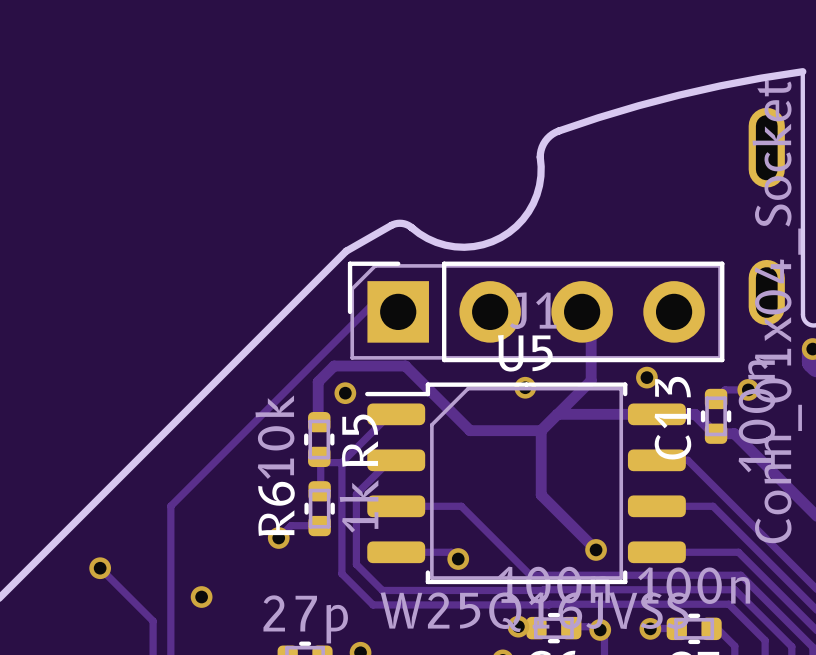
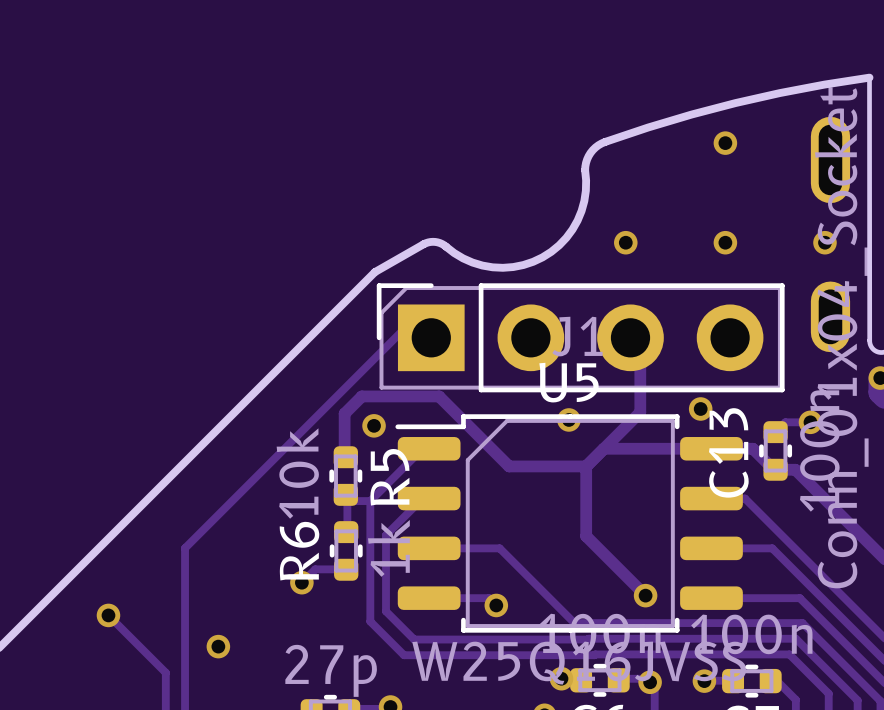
via: none -> (725, 143)
via: none -> (625, 242)
via: none -> (725, 242)
via: none -> (824, 242)

